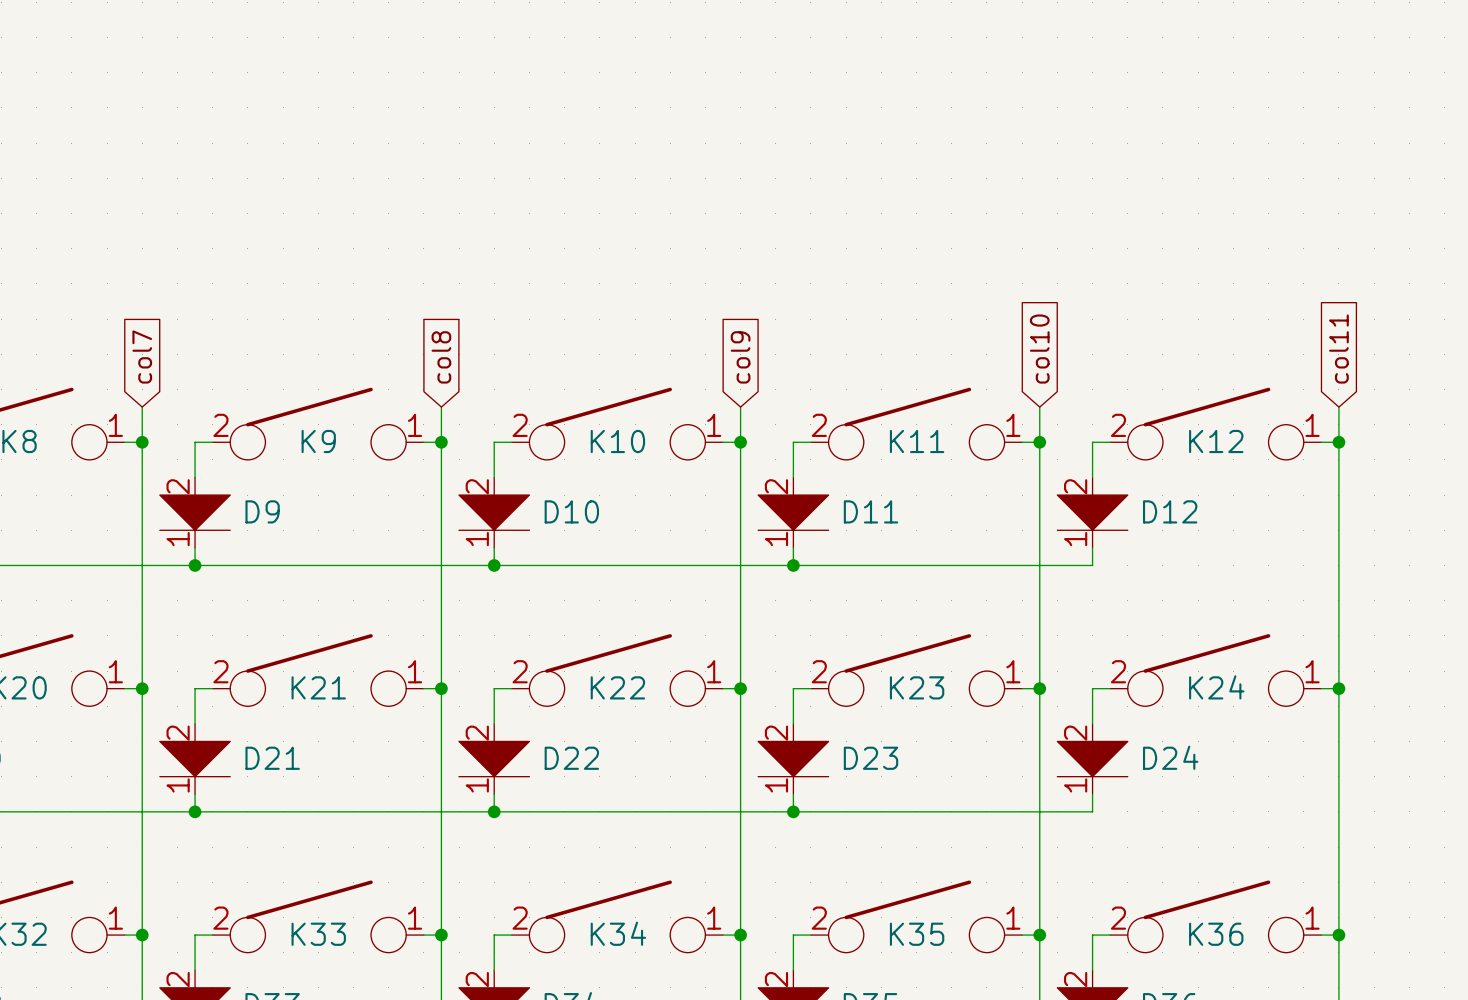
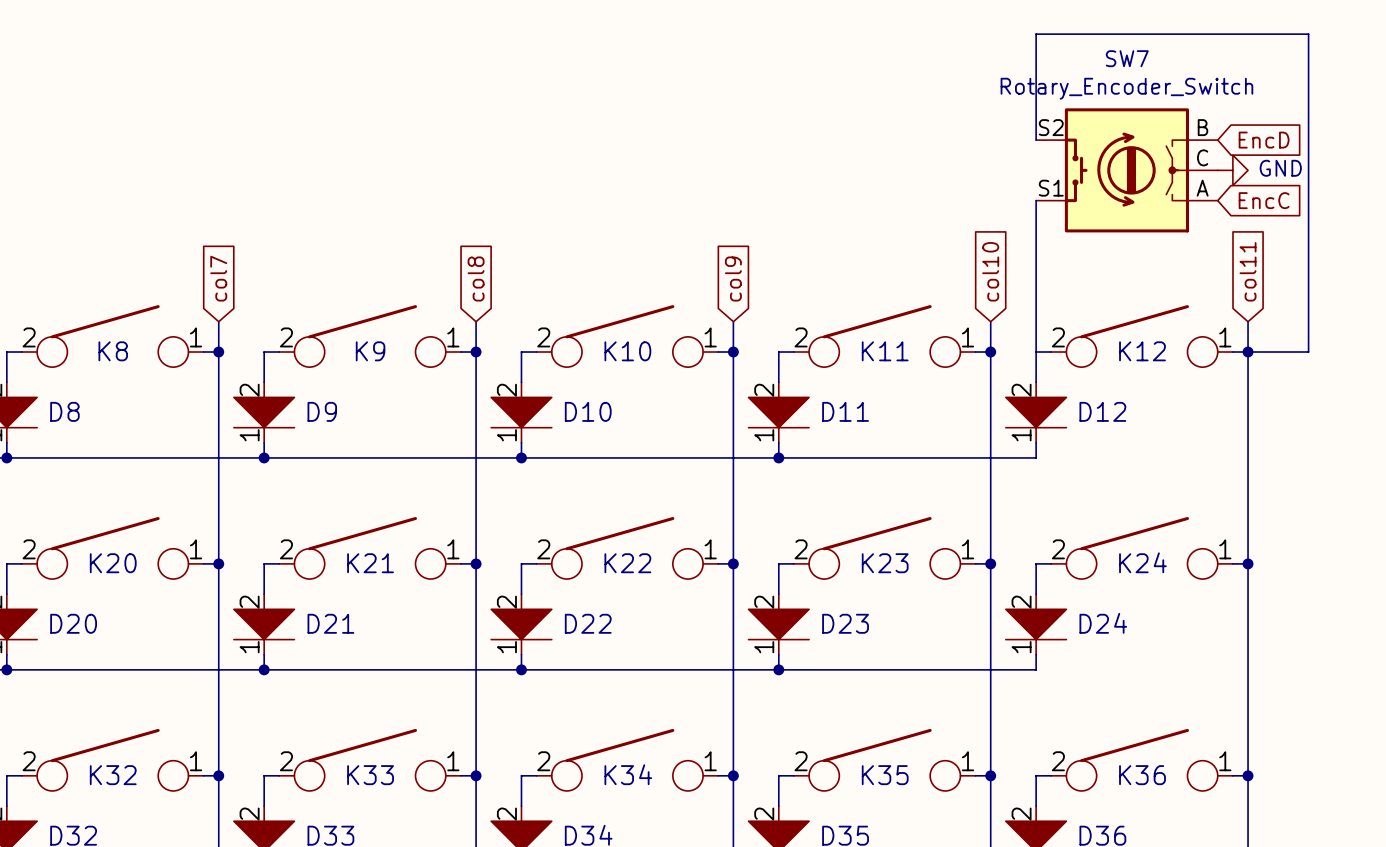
wire: none -> (1036, 140) (1036, 34) (1308, 34) (1308, 352) (1248, 352)
global label: none -> EncD (1264, 140)
SW7: none -> Rotary_Encoder_Switch (1126, 170)
power symbol: none -> GND (1232, 170)
wire: none -> (1036, 200) (1036, 352)
global label: none -> EncC (1264, 200)

